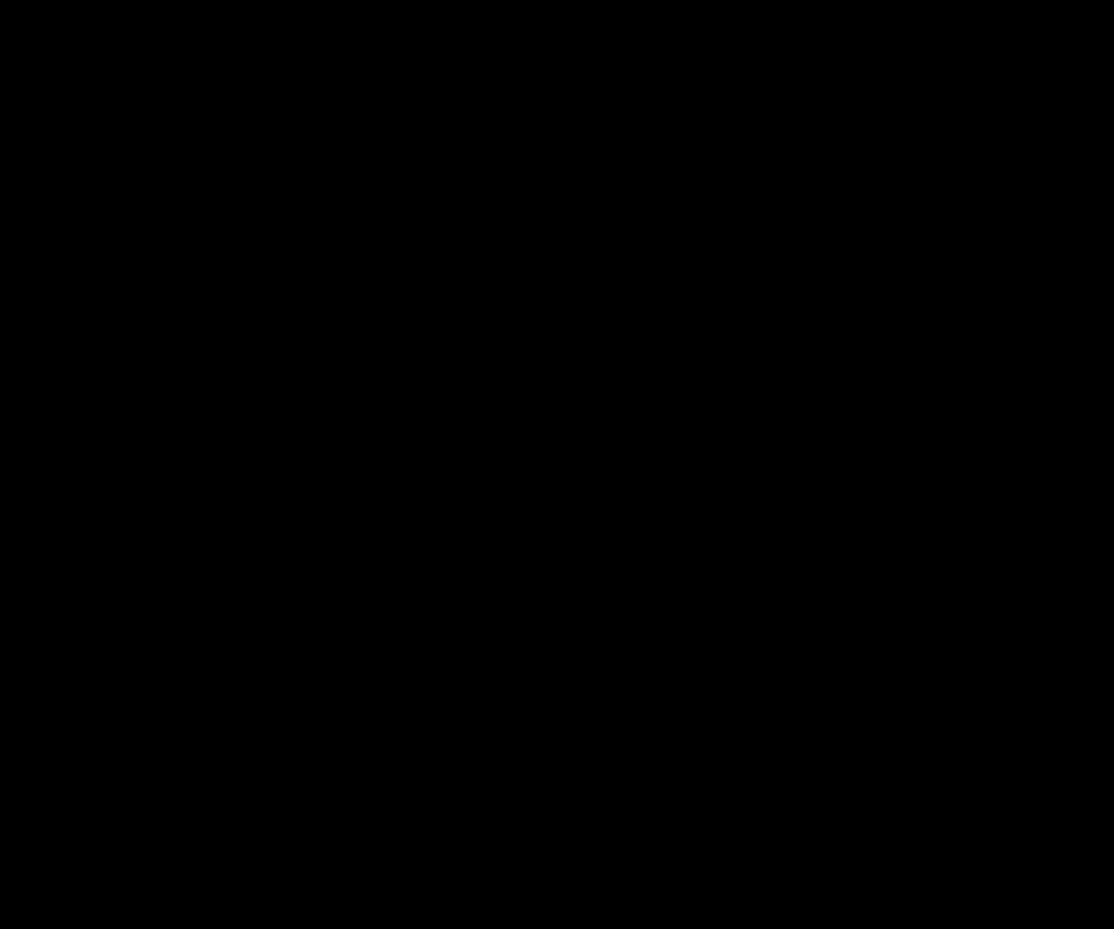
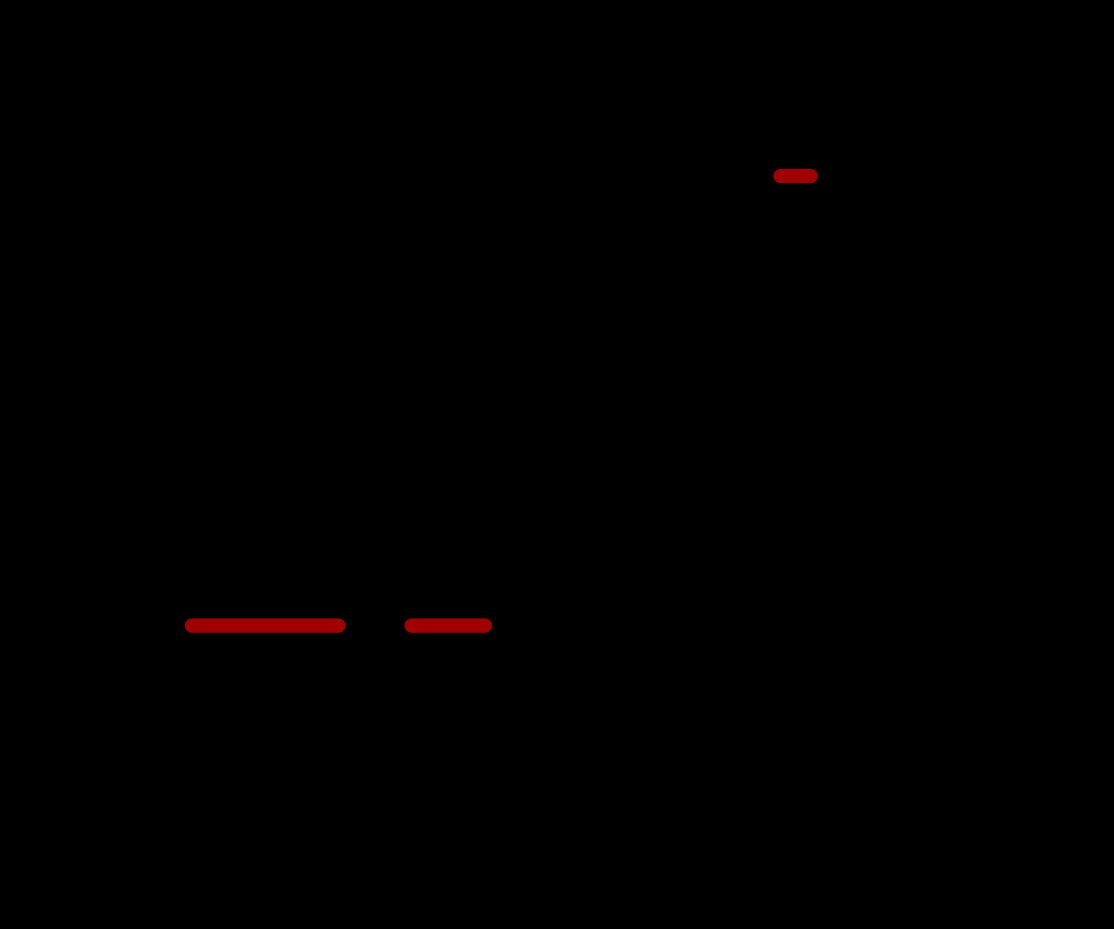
top track: none -> (780, 176) (810, 176)
top track: none -> (191, 625) (338, 625)
top track: none -> (411, 625) (484, 625)

